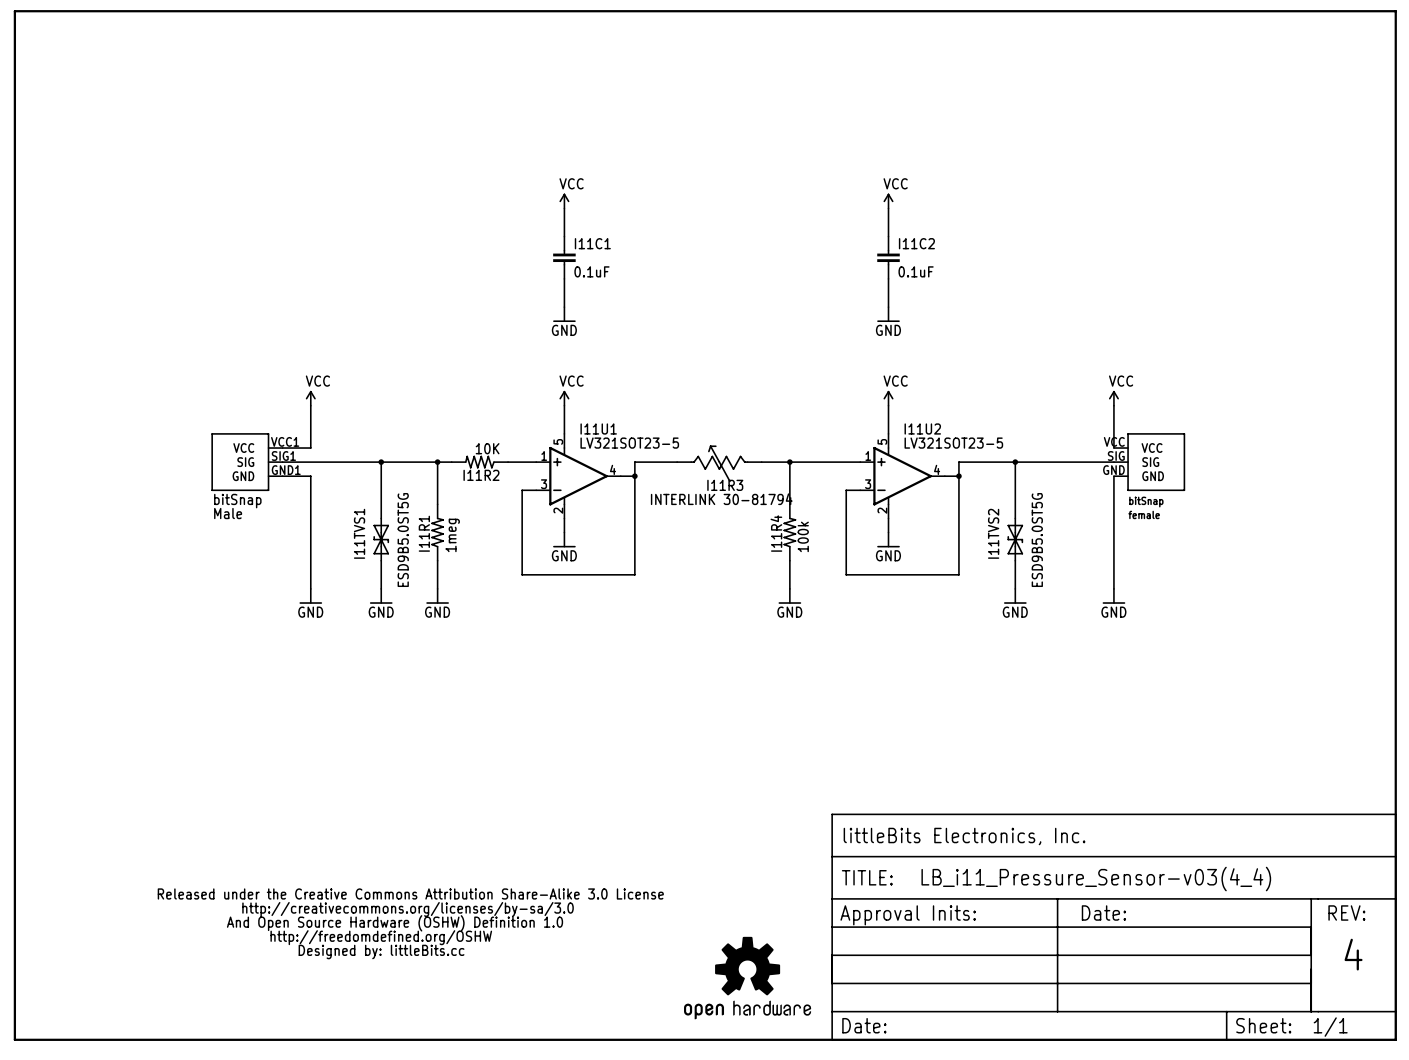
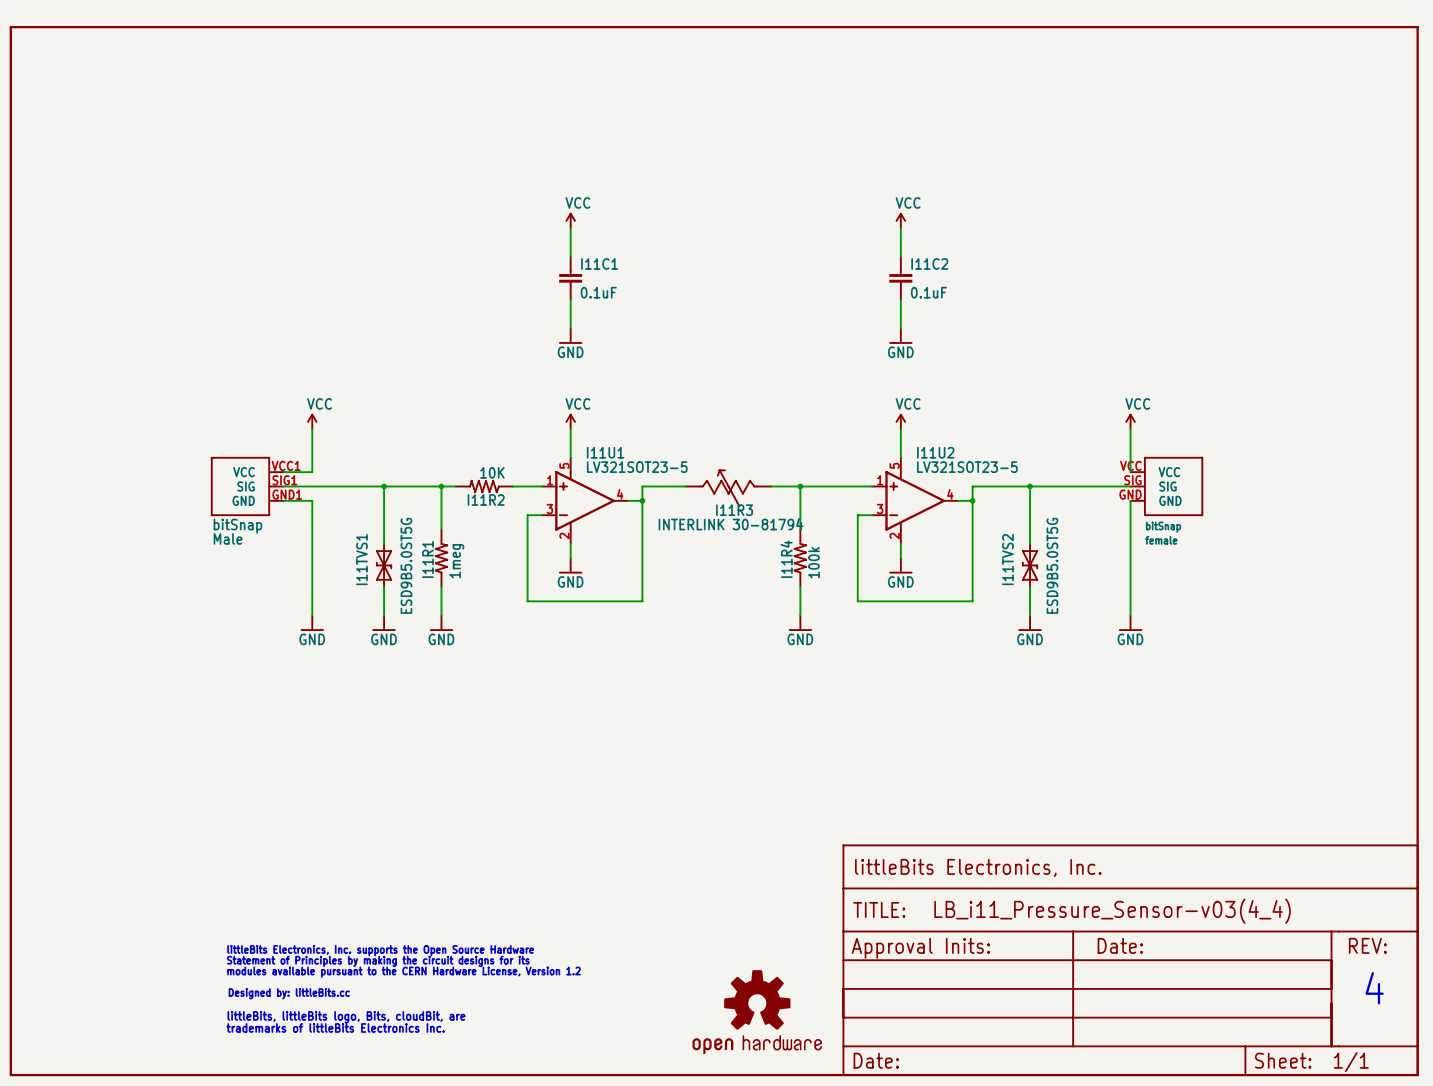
part: (410, 923) -> none
part: none -> (403, 988)

